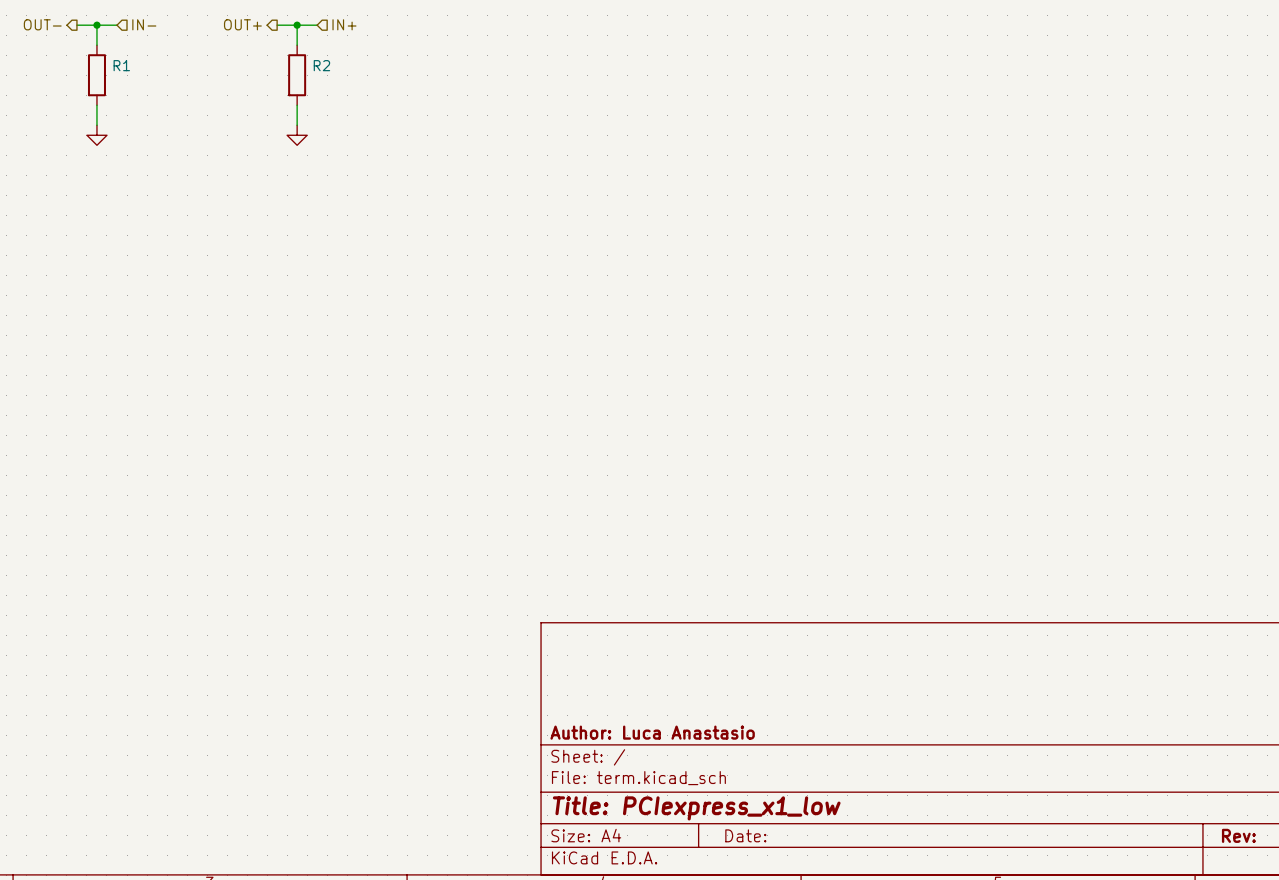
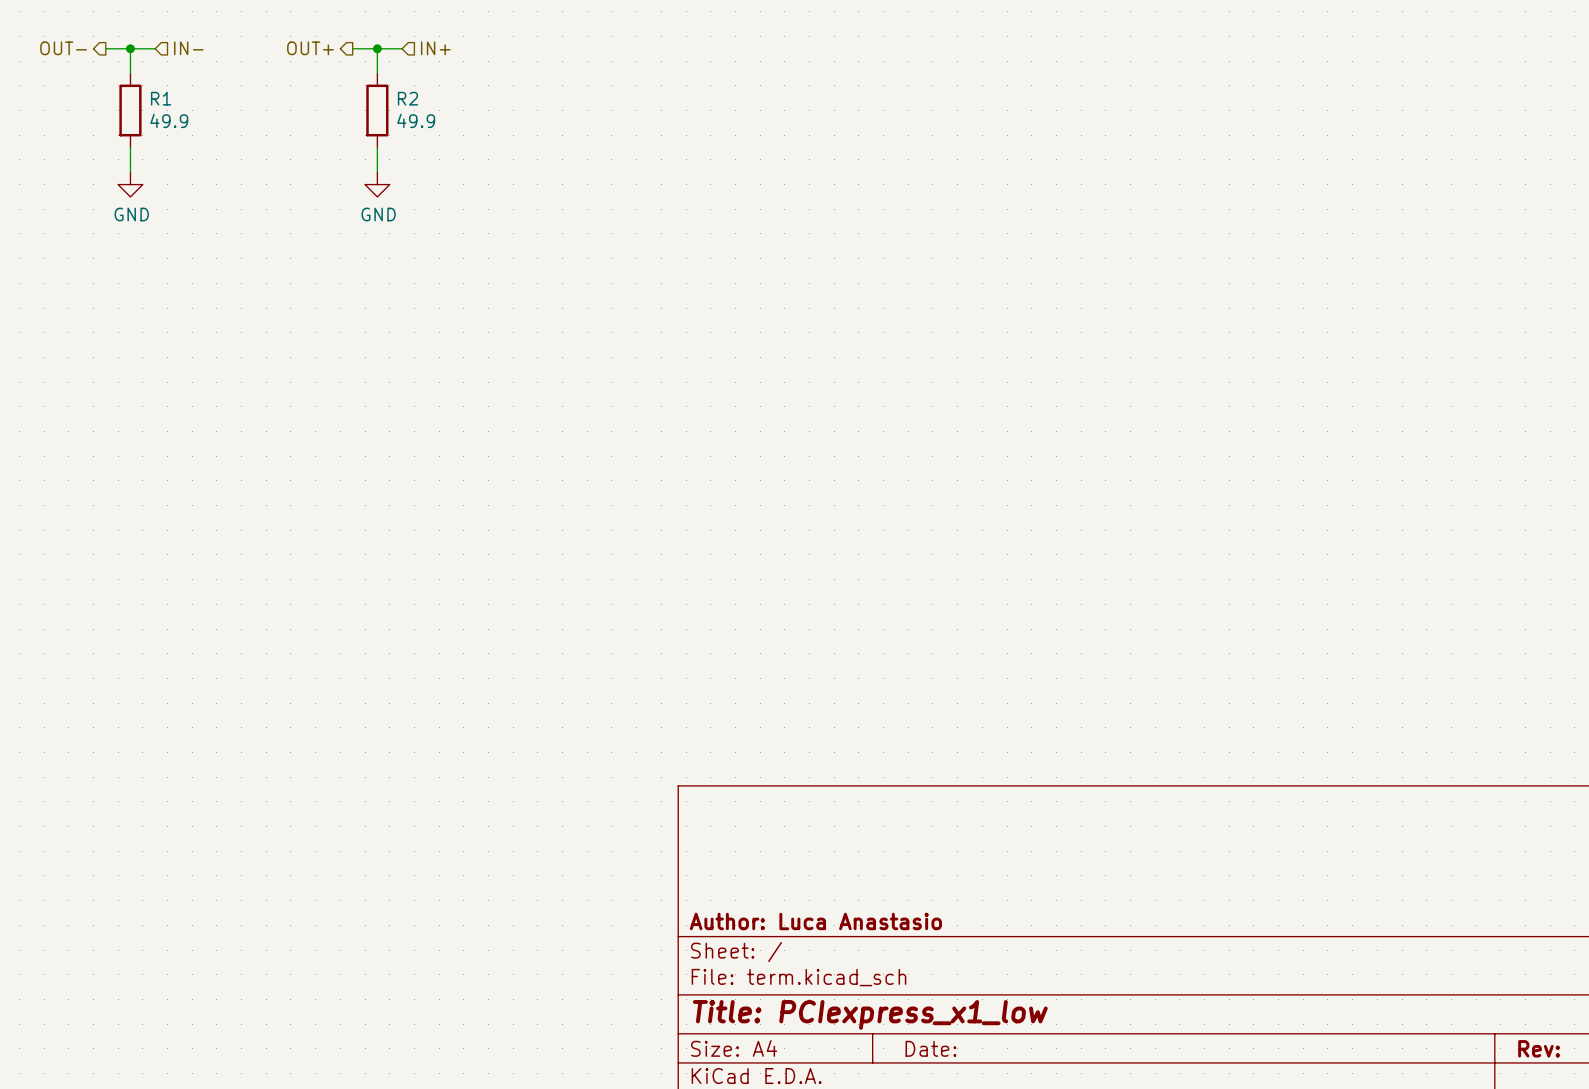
R1 value: none -> 49.9 (169, 120)
R2 value: none -> 49.9 (416, 120)
power symbol text: none -> GND (131, 214)
power symbol text: none -> GND (378, 214)

